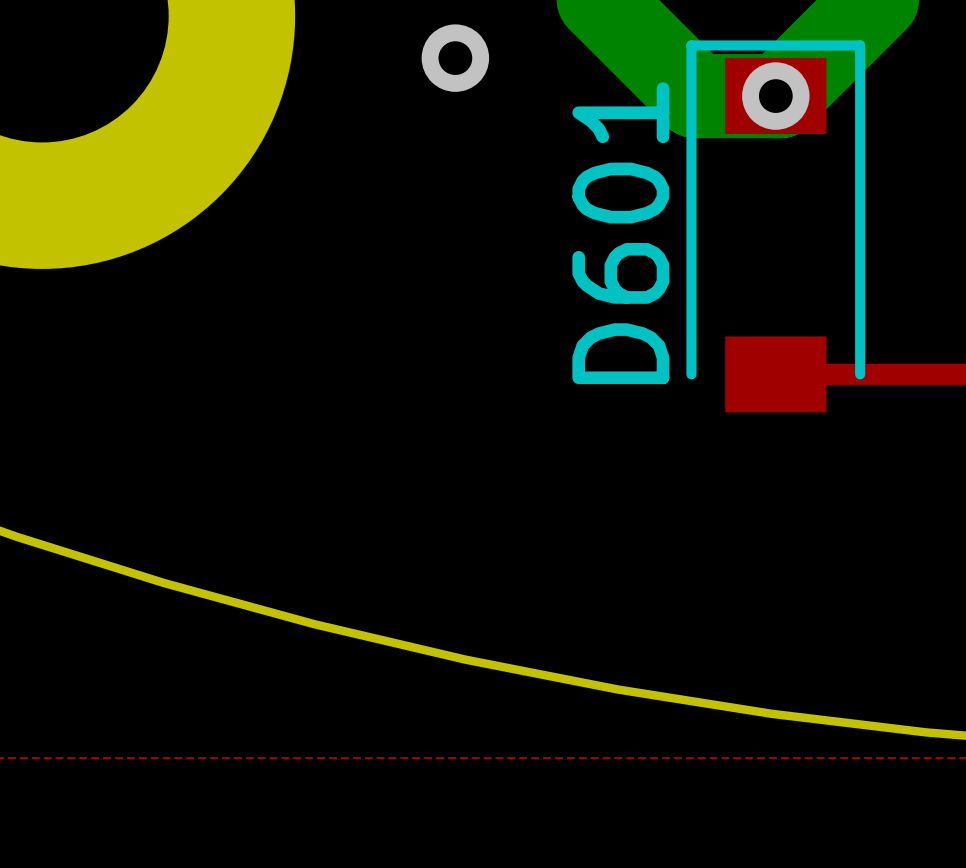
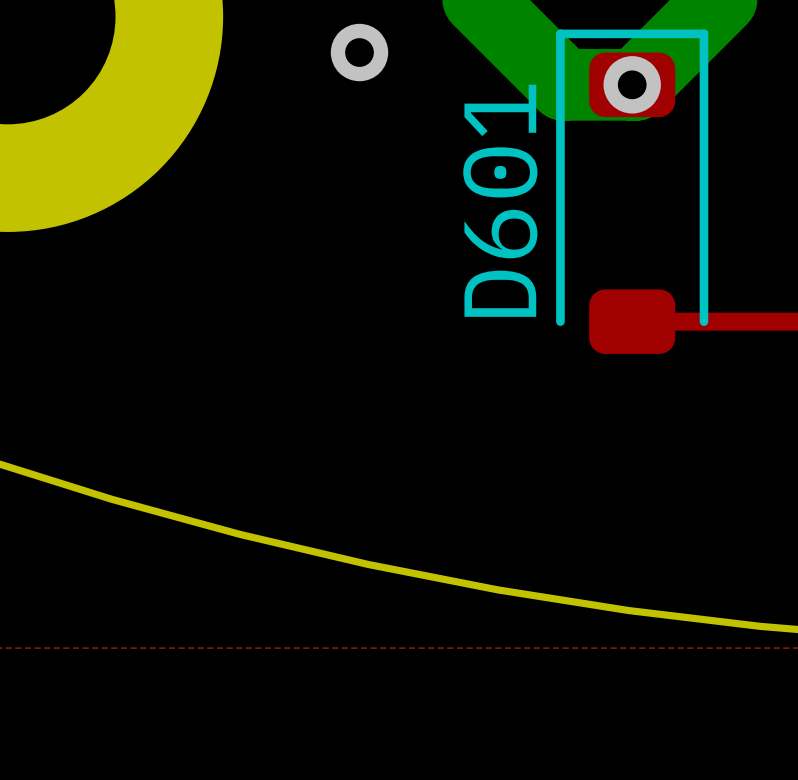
D601 footprint: [686, 40, 866, 413] -> [556, 29, 709, 354]

